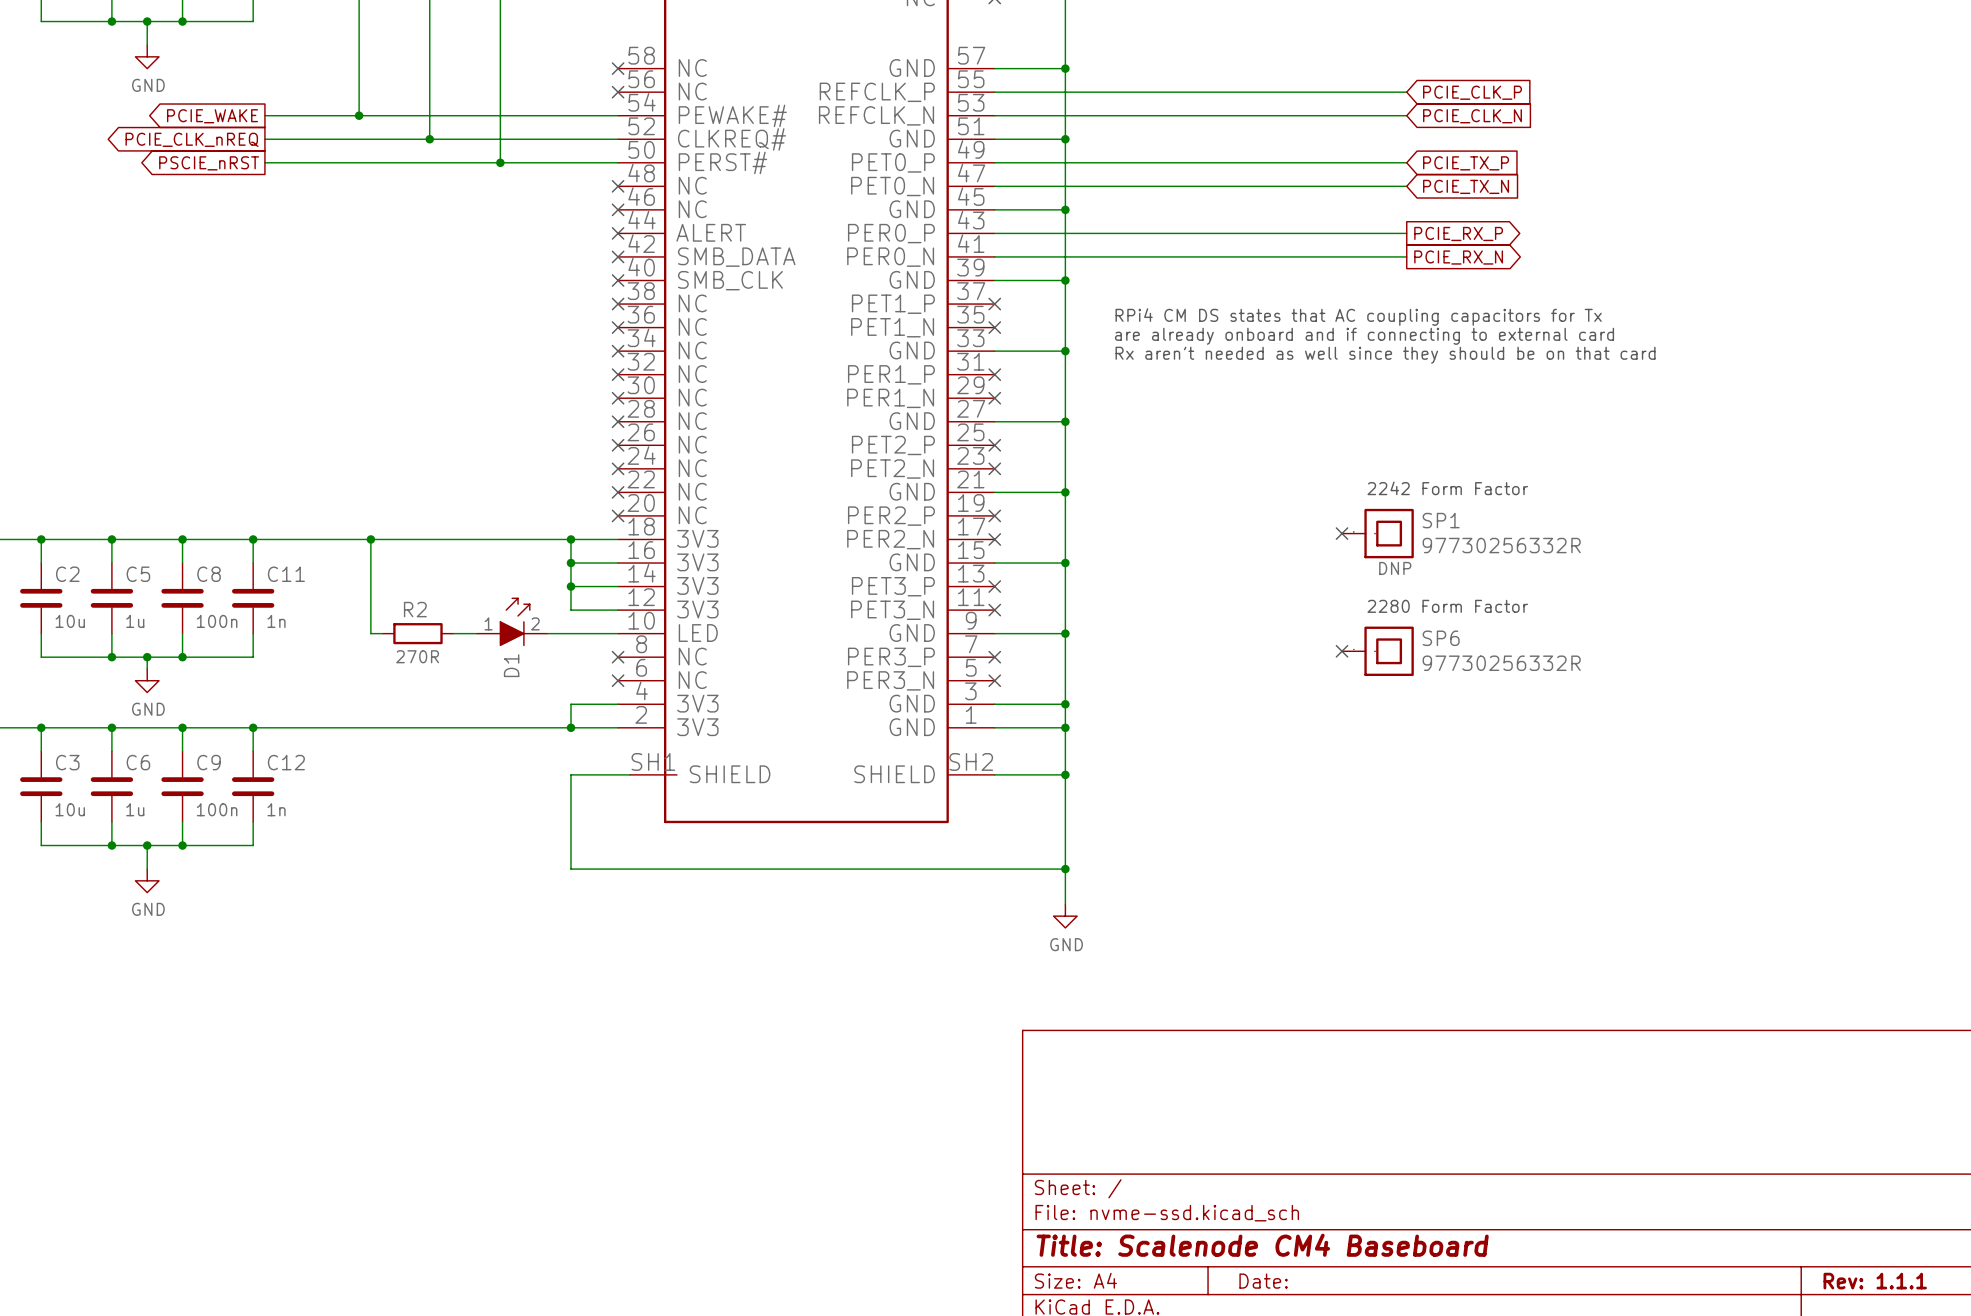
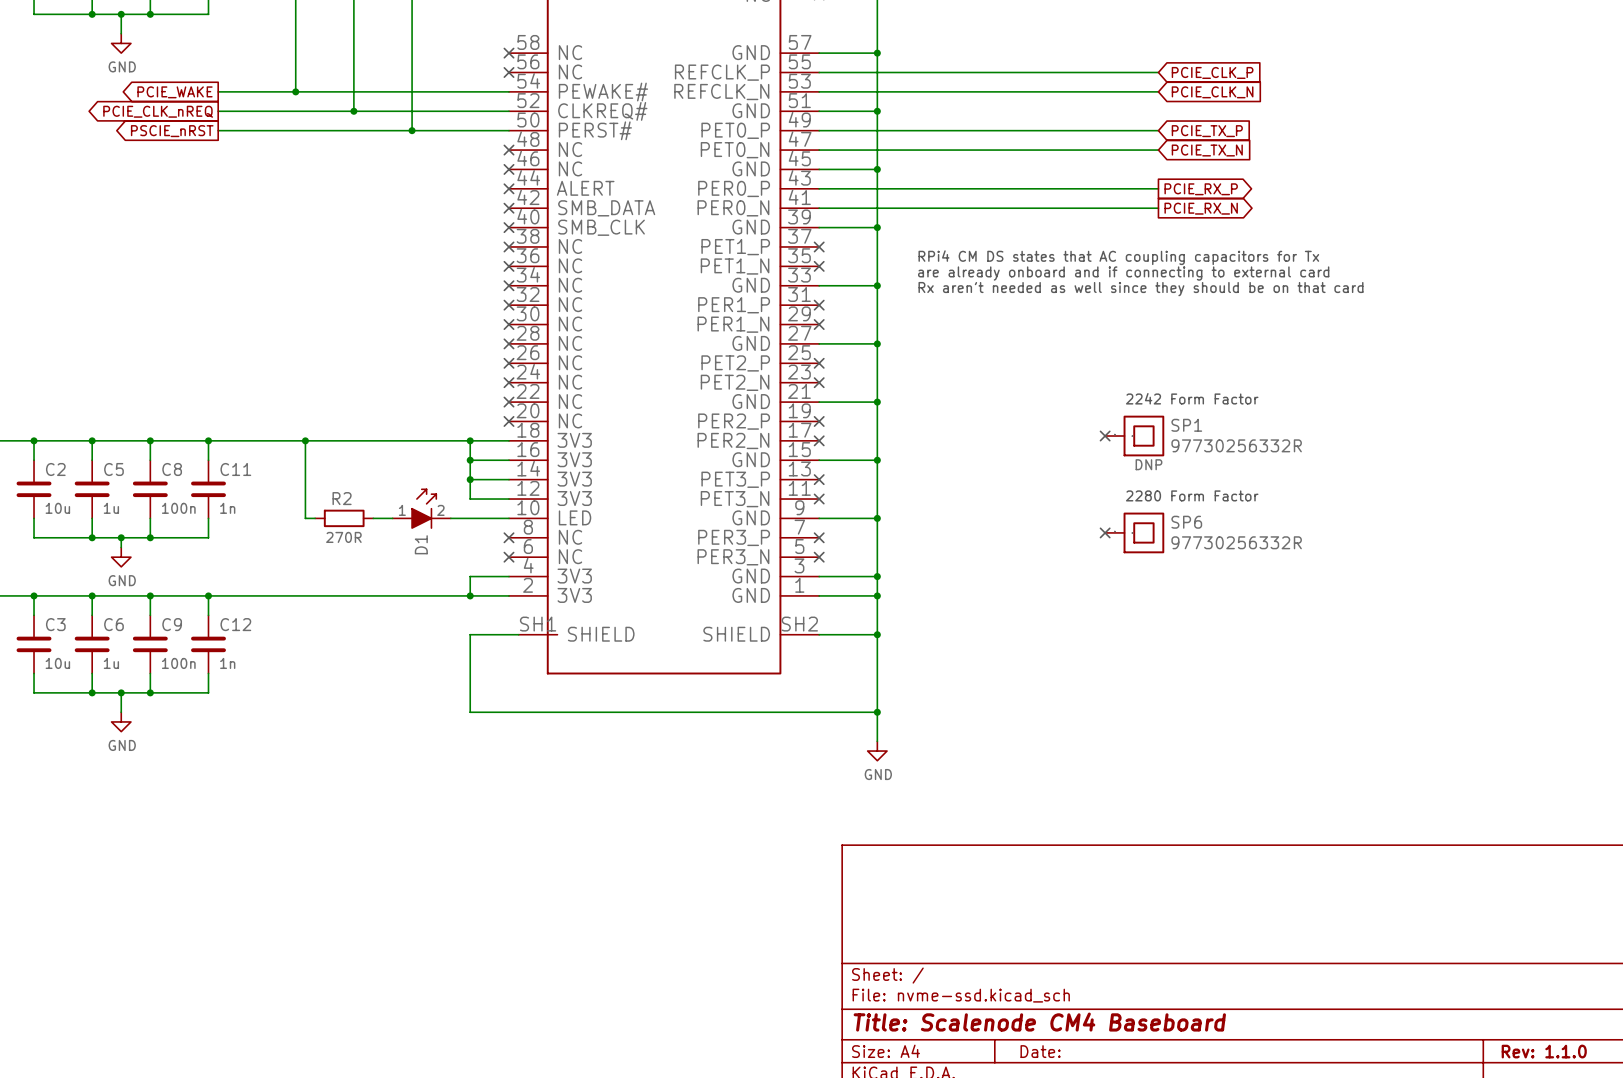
title block: Rev: 1.1.1 (1875, 1281) -> Rev: 1.1.0 (1544, 1051)

